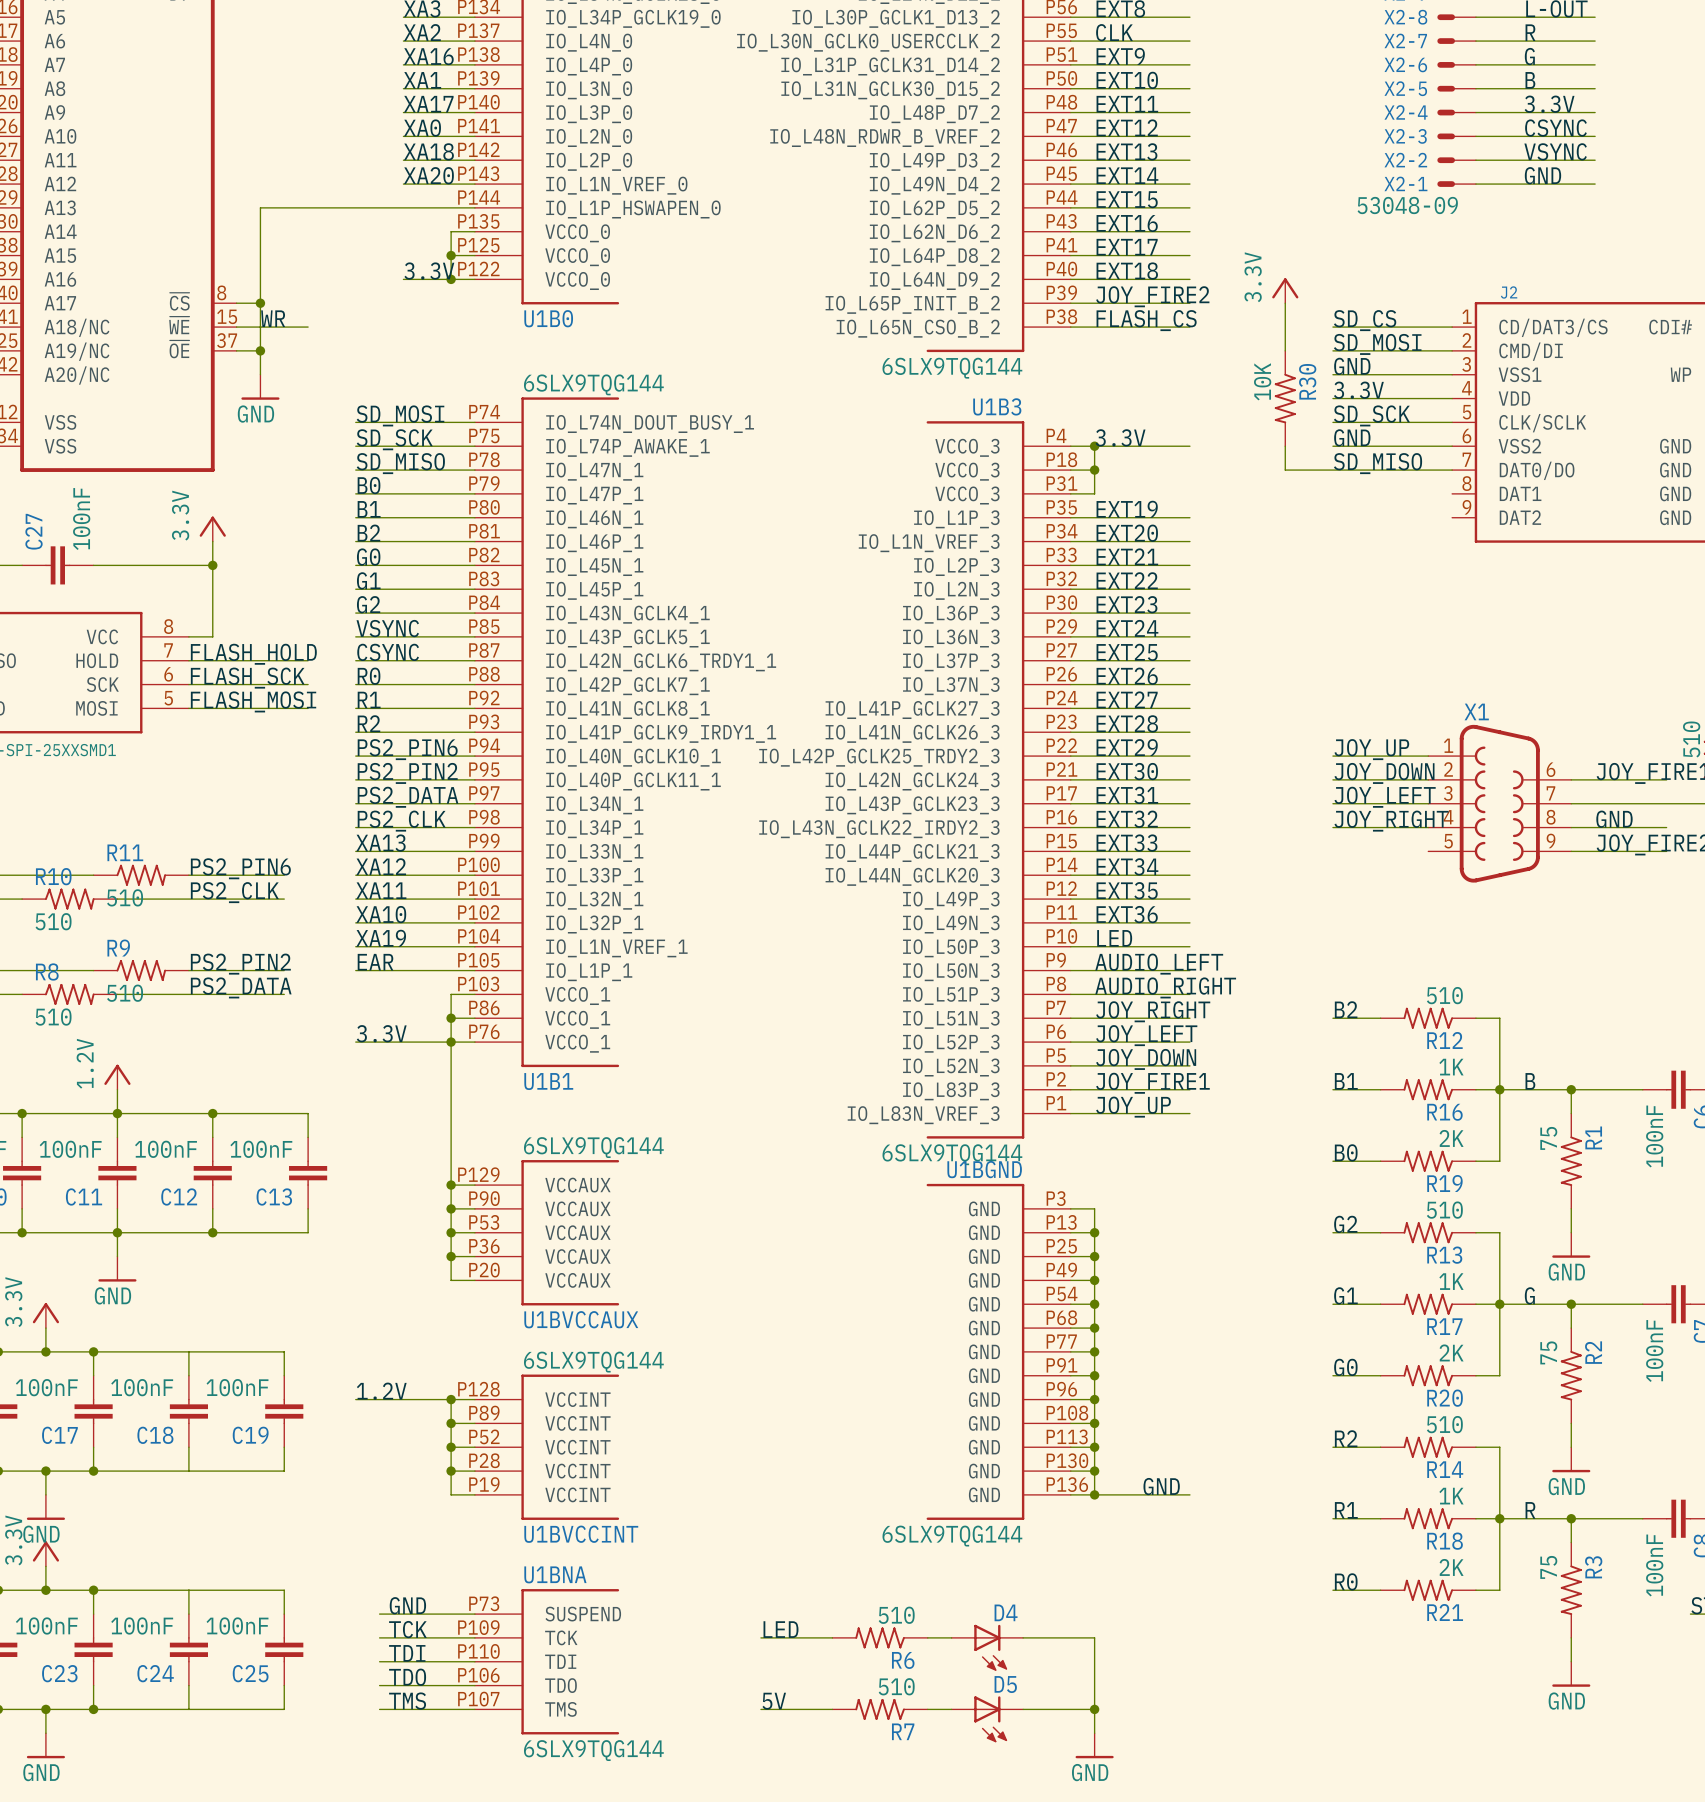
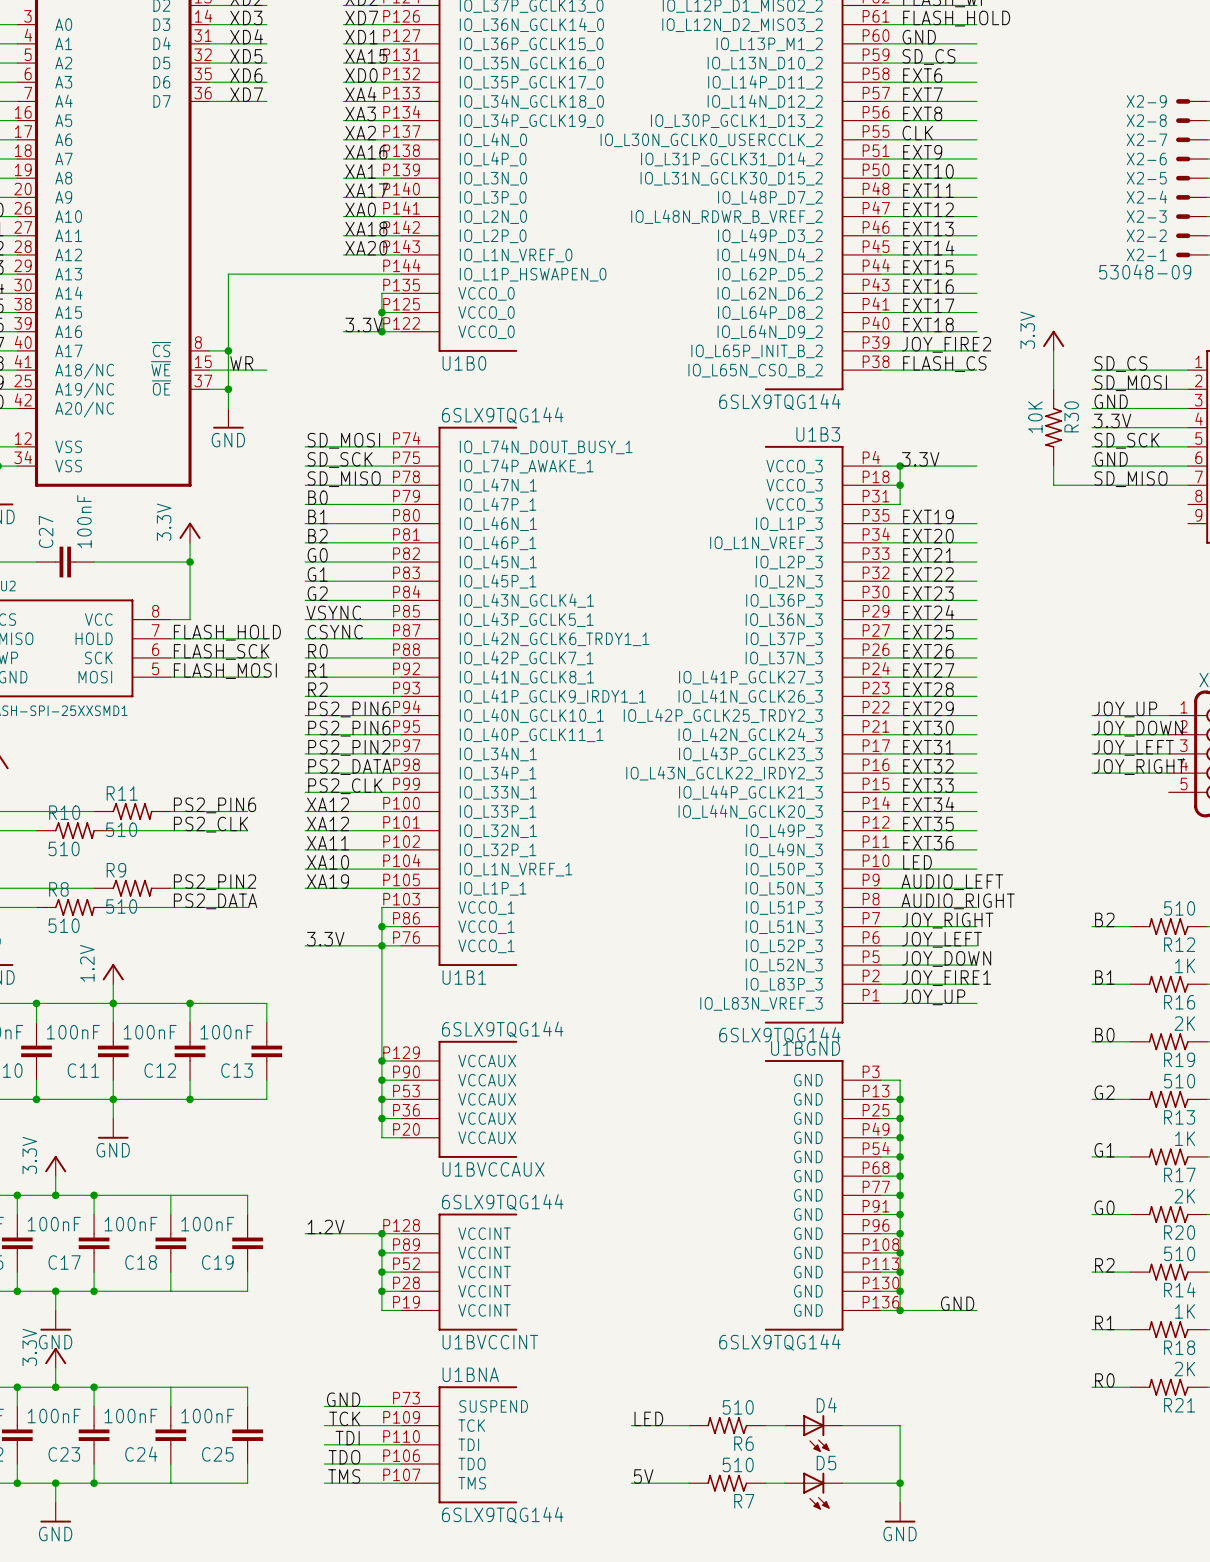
label: PS2_PIN2 (407, 773) -> PS2_PIN6 (349, 728)
label: PS2_DATA (408, 797) -> PS2_PIN2 (349, 747)
label: PS2_CLK (401, 821) -> PS2_DATA (349, 767)
label: XA13 (380, 843) -> PS2_CLK (345, 786)
label: XA11 (381, 890) -> XA12 (328, 823)
label: XA10 (381, 914) -> XA11 (328, 843)
label: XA19 (381, 938) -> XA10 (328, 862)
label: EAR (375, 962) -> XA19 (328, 881)

